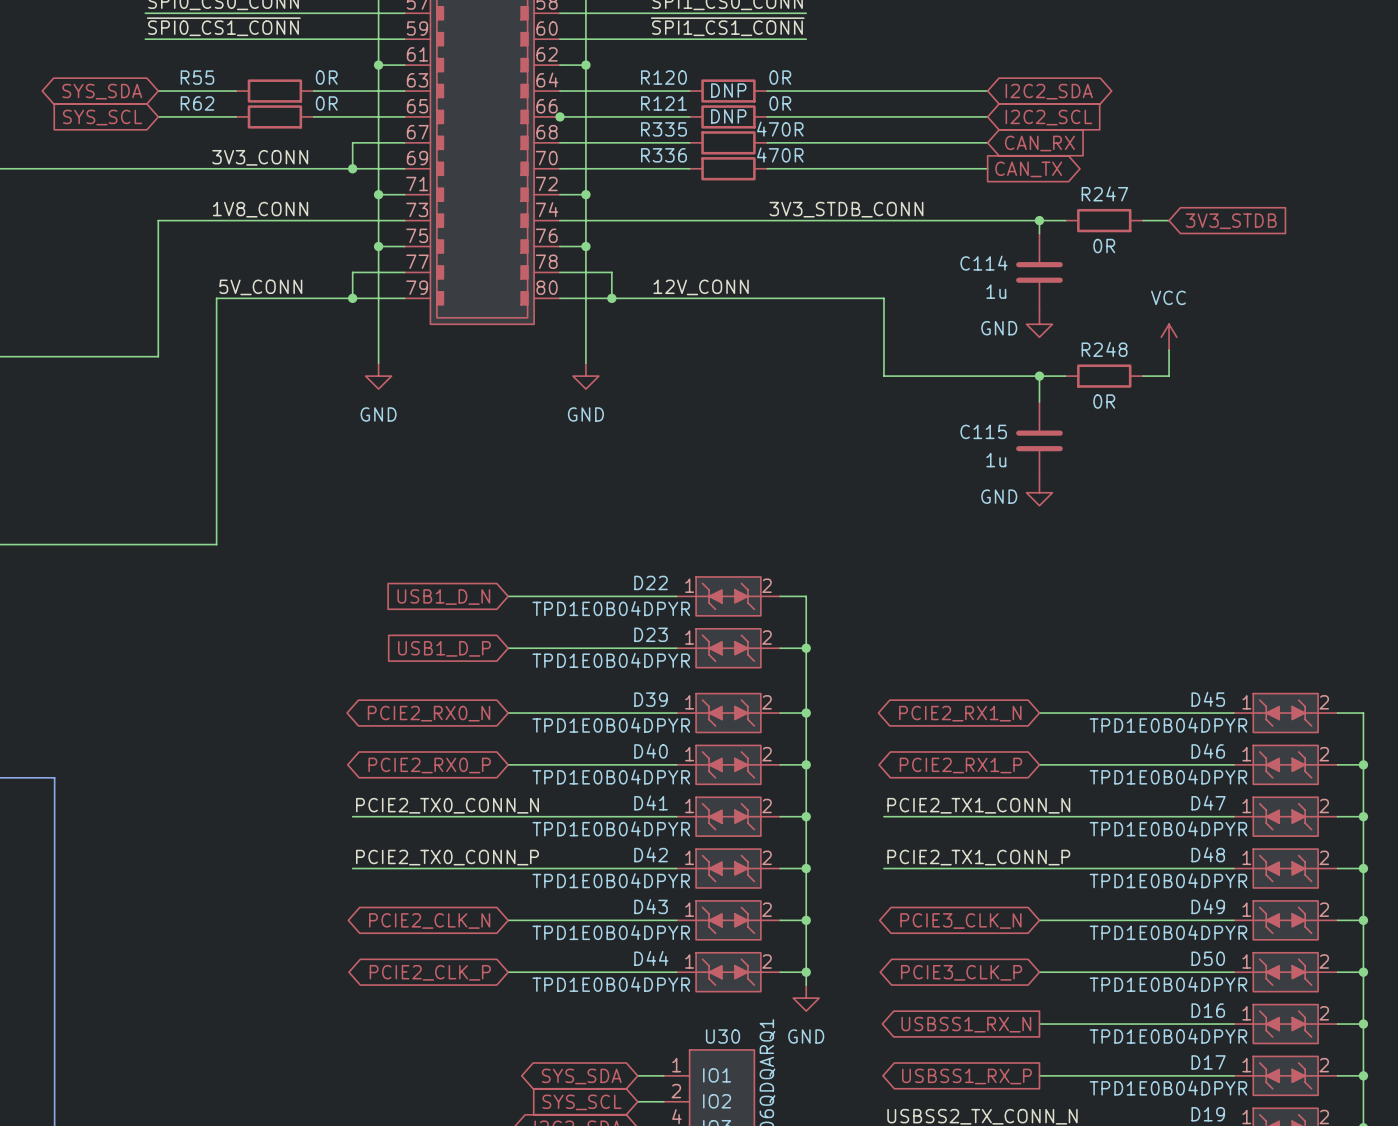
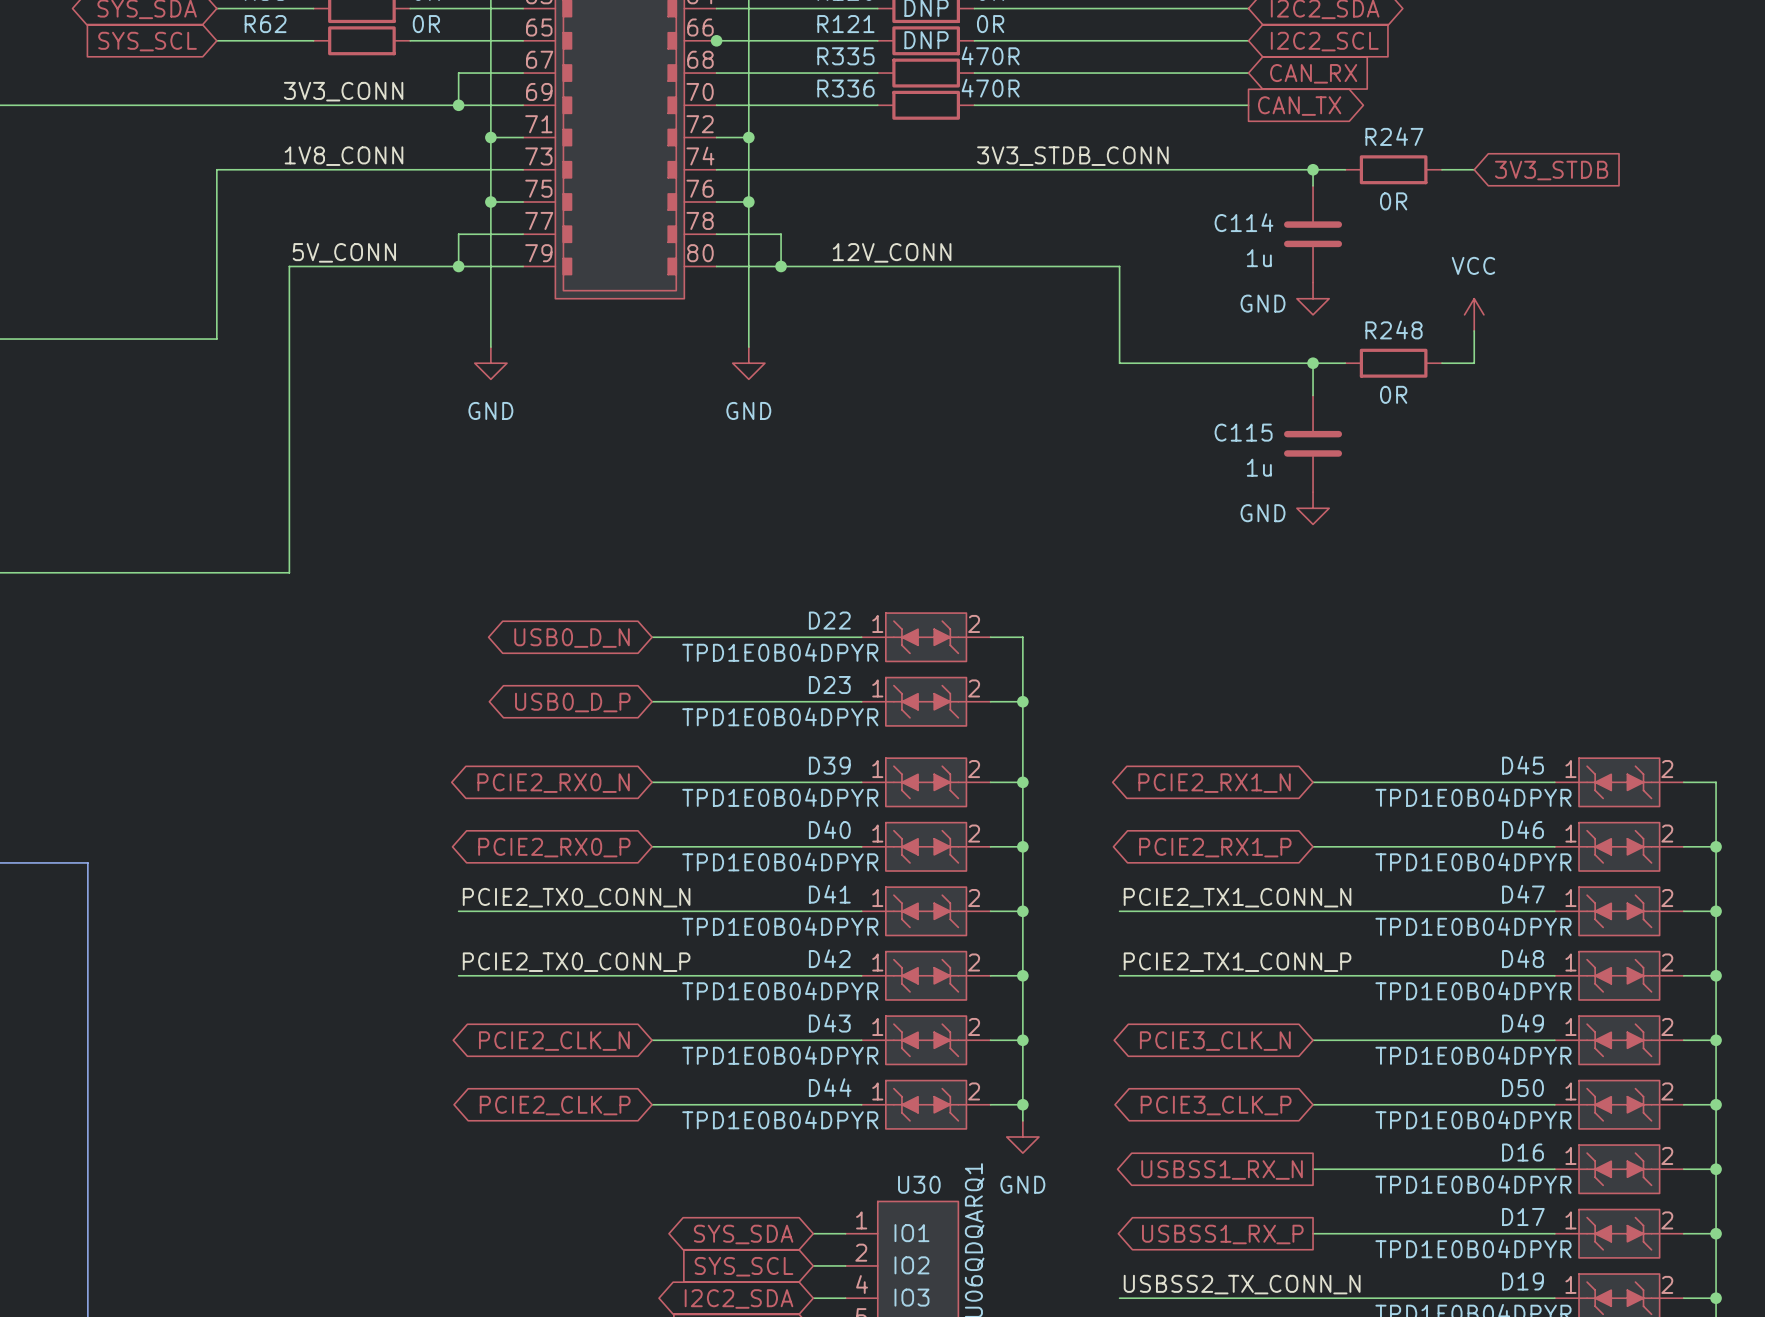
global label shape: input (443, 597) -> bidirectional (572, 638)
global label: USB1_D_N (443, 597) -> USB0_D_N (572, 638)
global label shape: input (444, 648) -> bidirectional (572, 702)
global label: USB1_D_P (444, 648) -> USB0_D_P (572, 702)

